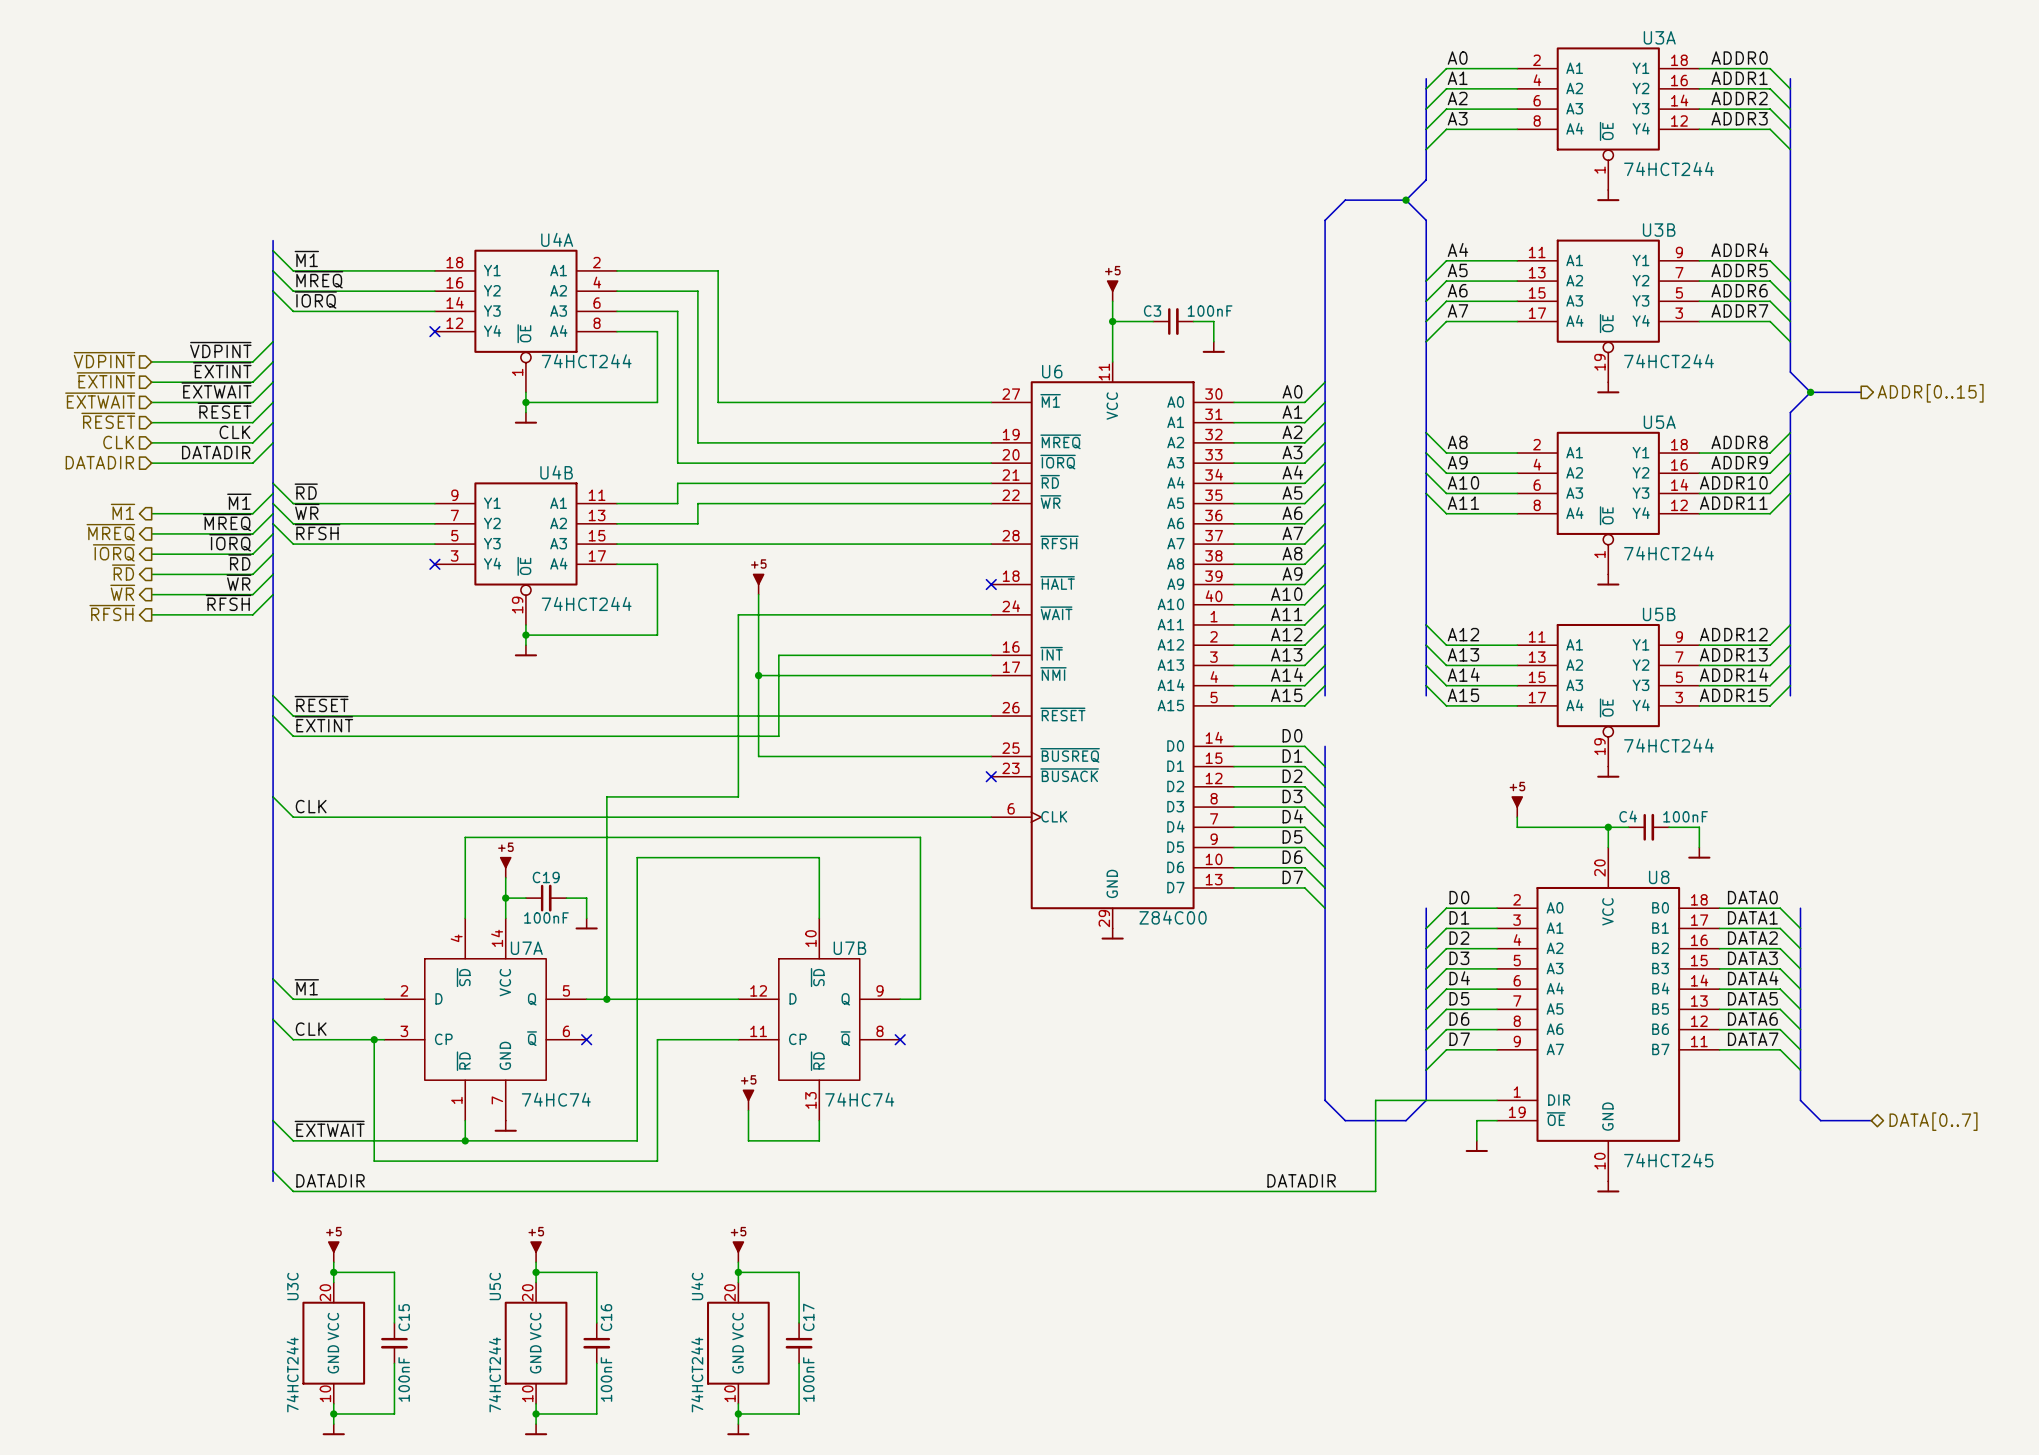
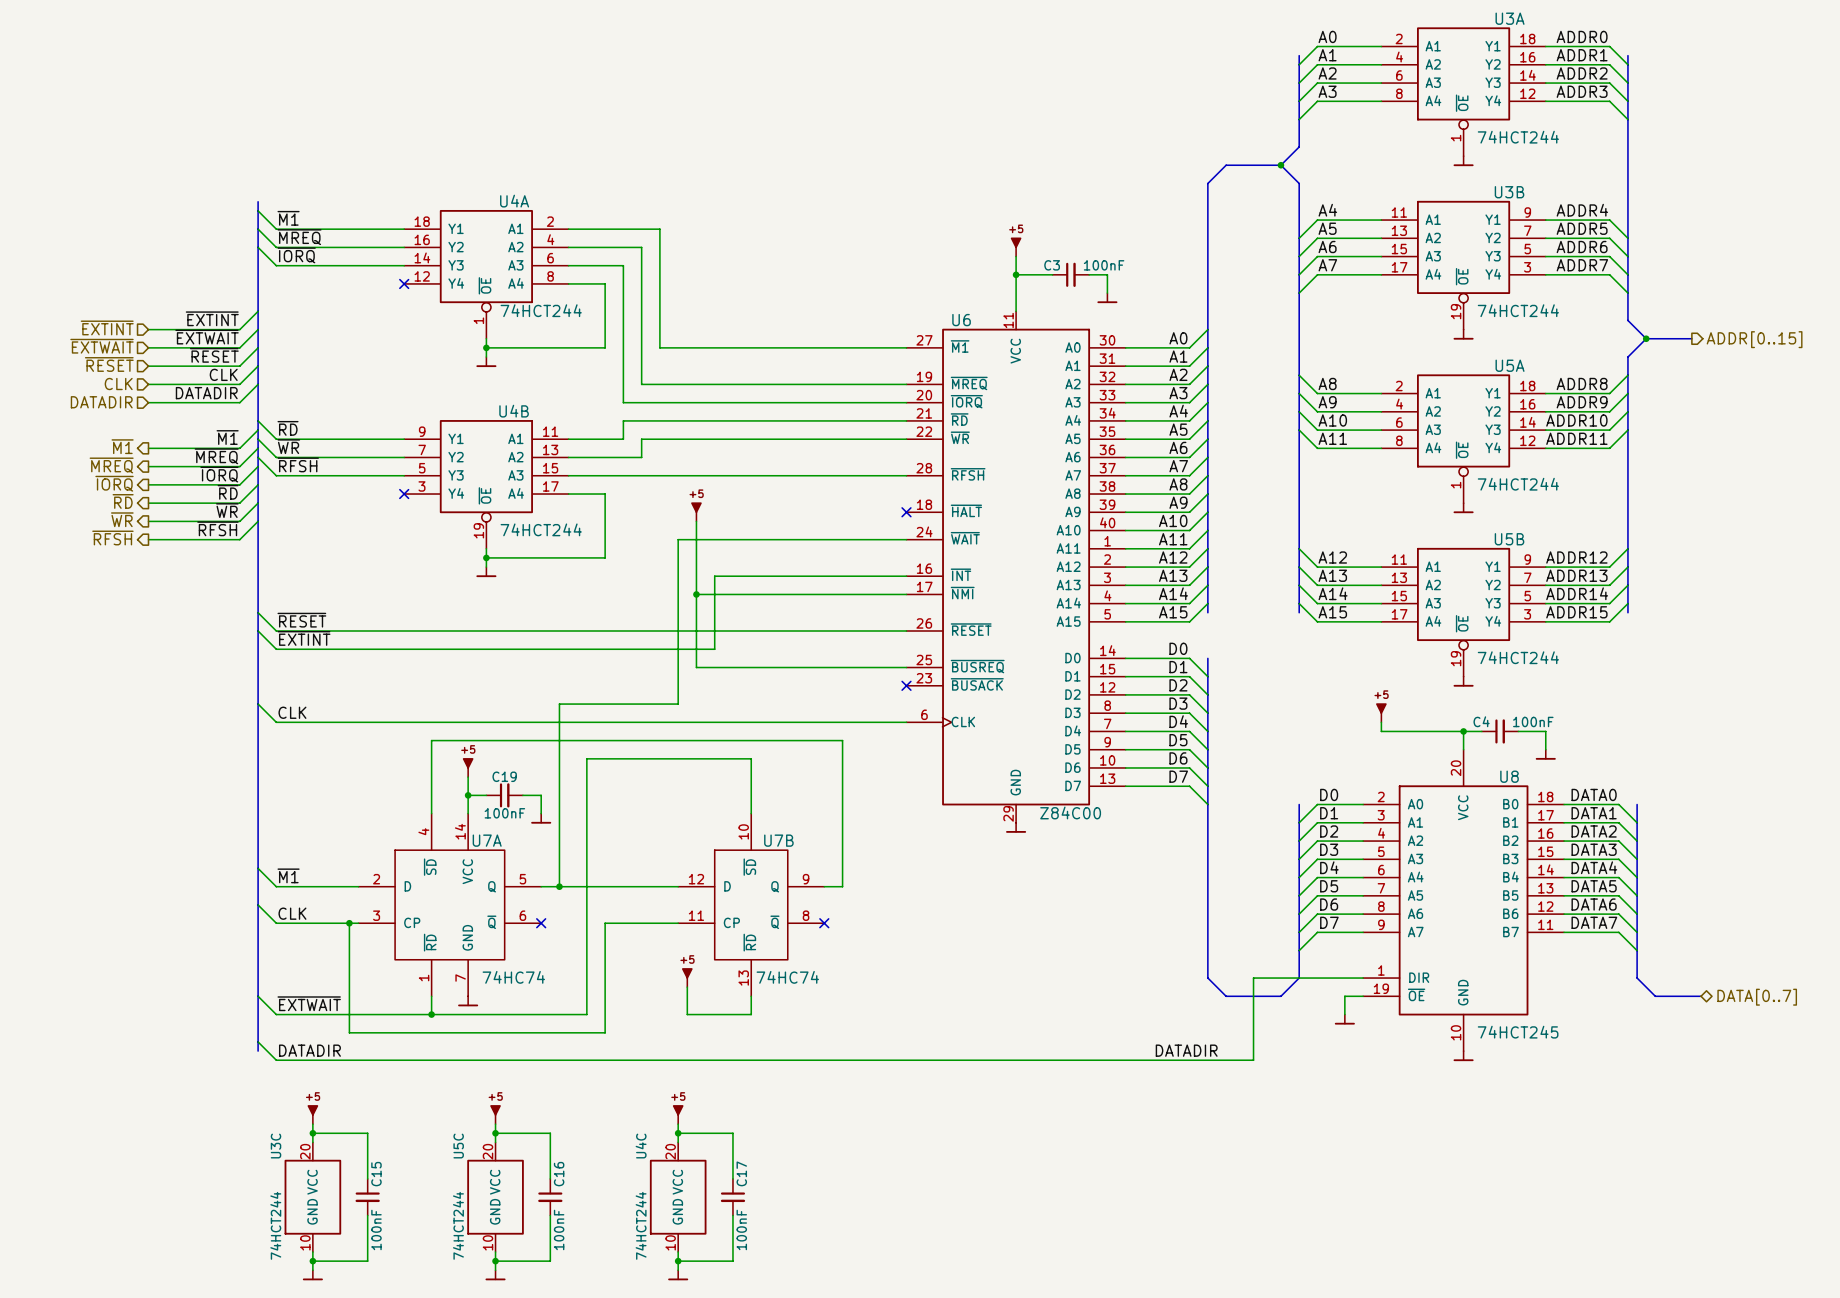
wire: (273, 341) (252, 361) (151, 361) -> none
label: ~{VDPINT} (220, 350) -> none
hierarchical label: ~{VDPINT} (104, 360) -> none

